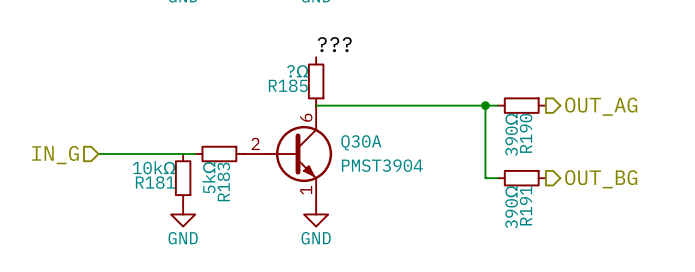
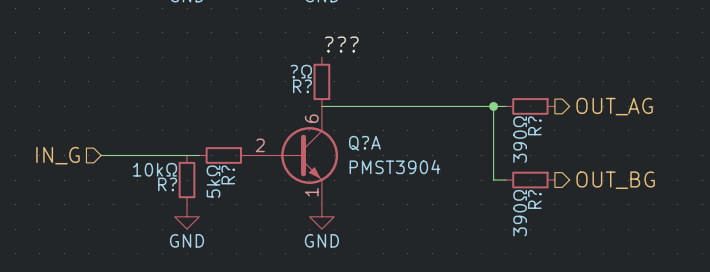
R185 name: R185 (288, 85) -> R? (302, 86)
R190 name: R190 (526, 133) -> R? (534, 125)
Q30A name: Q30A (361, 142) -> Q?A (364, 143)
R183 name: R183 (223, 181) -> R? (228, 174)
R181 name: R181 (155, 182) -> R? (167, 184)
R191 name: R191 (526, 205) -> R? (534, 199)

